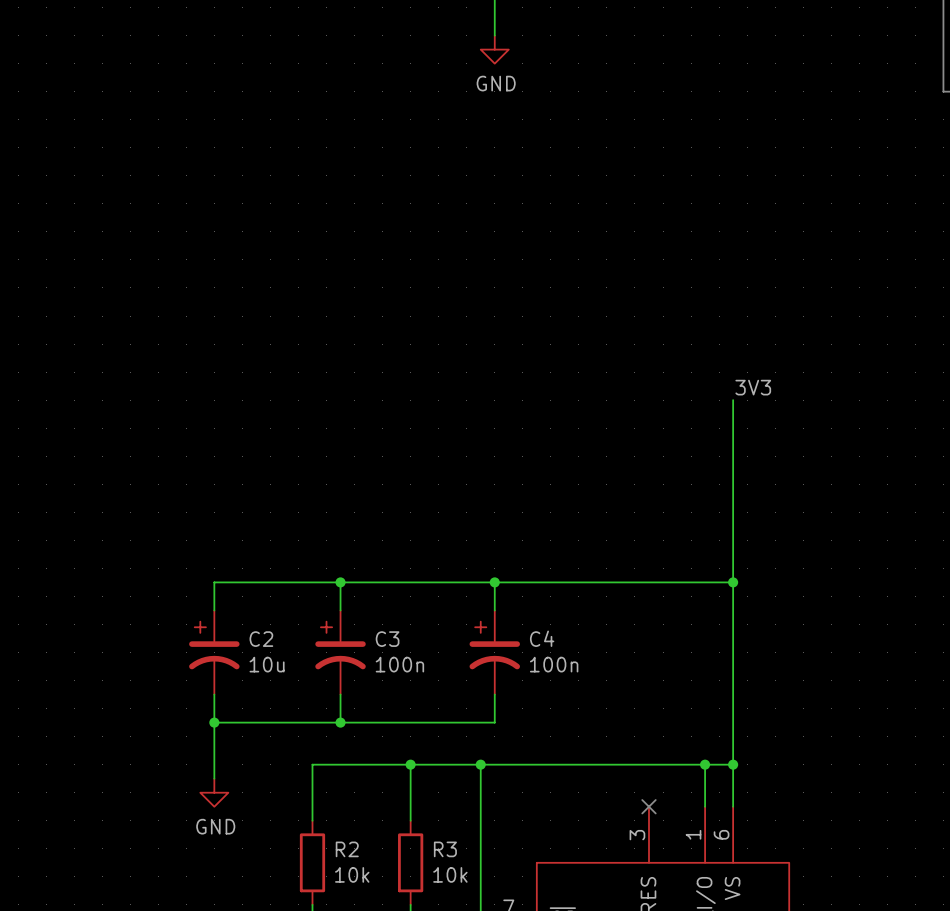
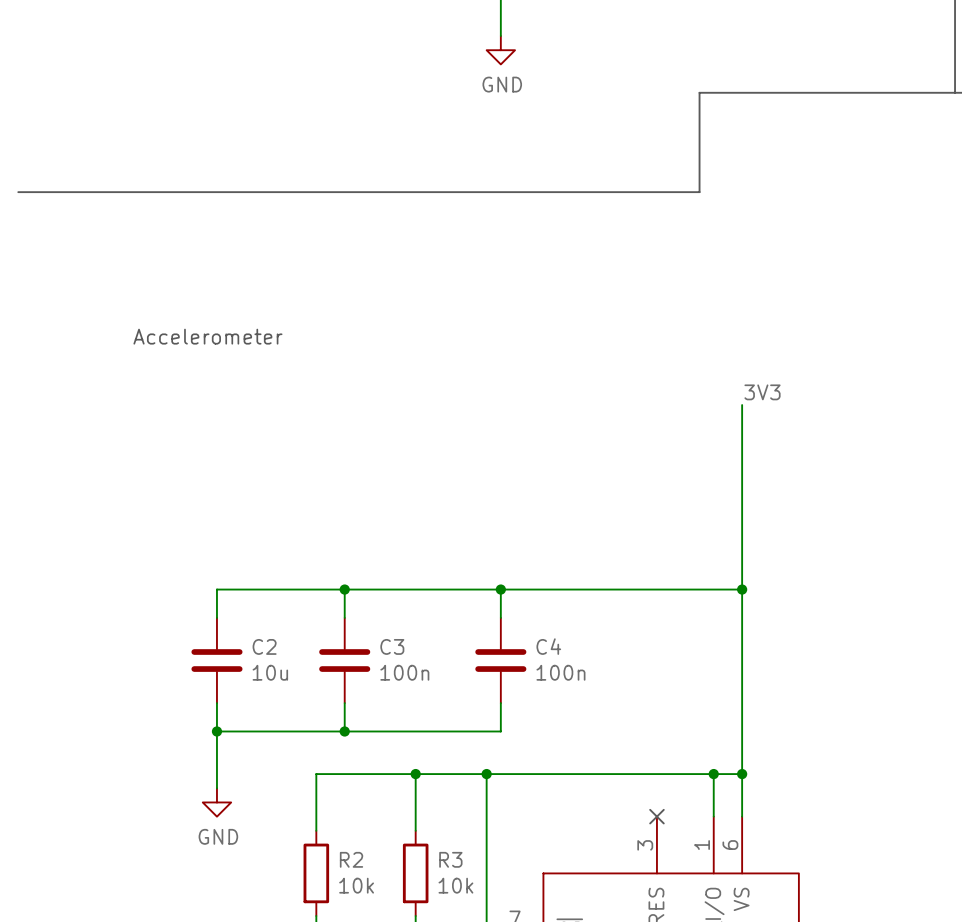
line: none -> (955, 92) (699, 92) (699, 192) (18, 192)
text: none -> Accelerometer (207, 336)
C2 symbol: [189, 610, 240, 695] -> [191, 617, 243, 704]
C3 symbol: [315, 610, 366, 695] -> [319, 617, 371, 704]
C4 symbol: [469, 610, 521, 695] -> [475, 617, 527, 704]

